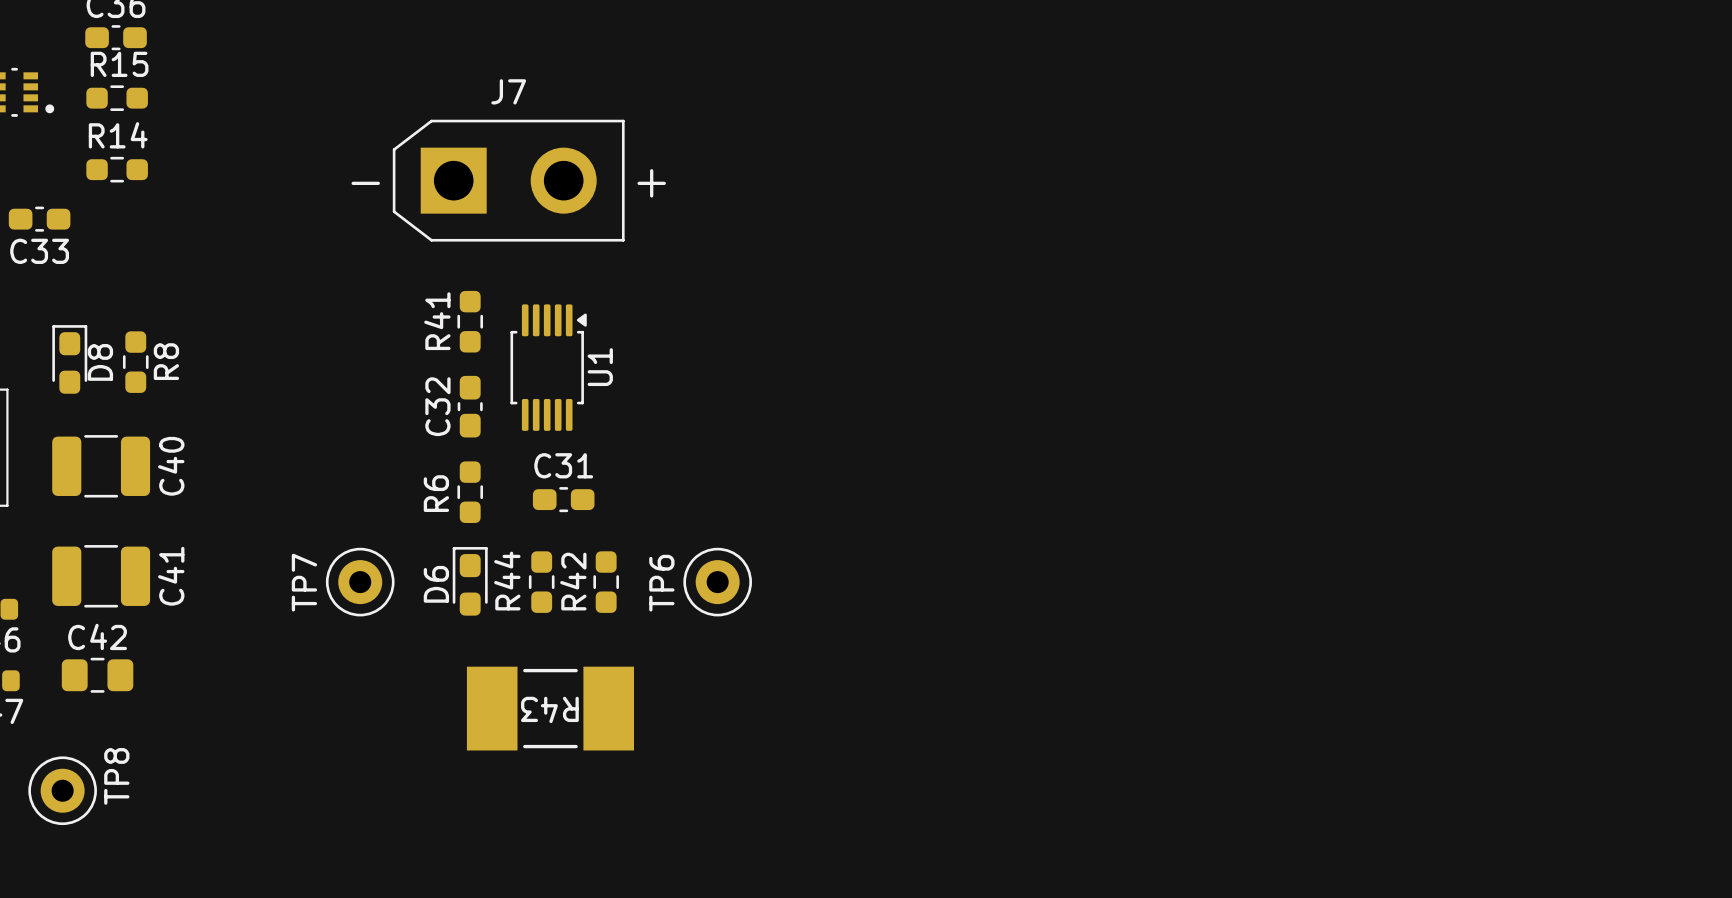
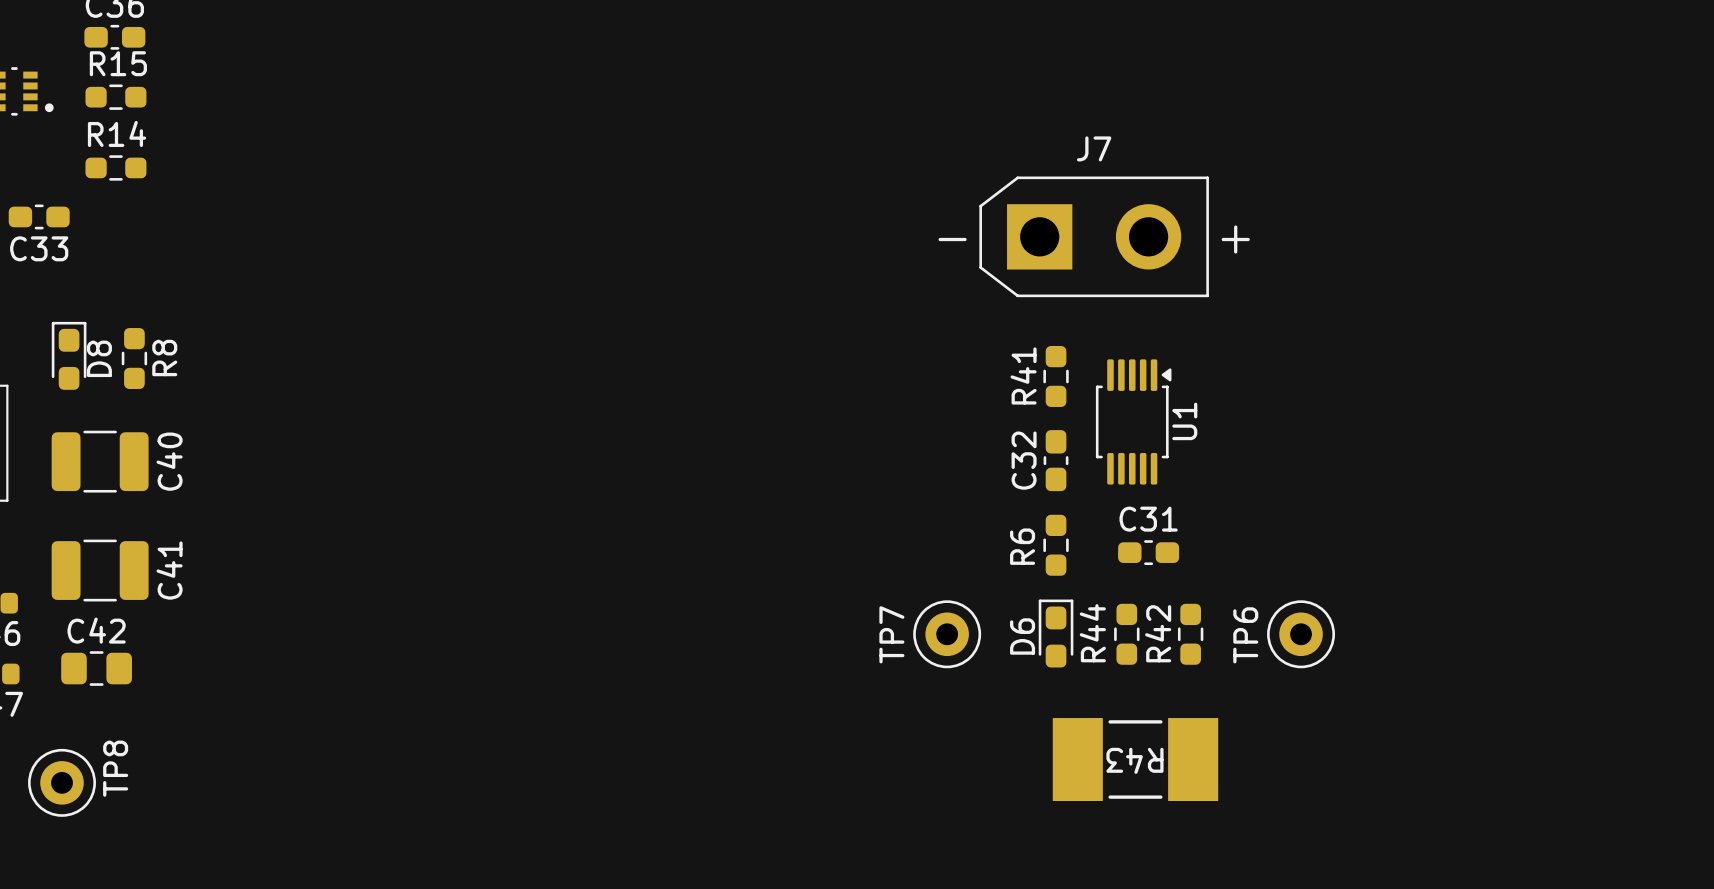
J7 position: (508, 180) -> (1094, 236)
R41 position: (470, 321) -> (1056, 376)
U1 position: (548, 367) -> (1133, 421)
C32 position: (470, 406) -> (1056, 460)
R6 position: (470, 492) -> (1056, 545)
C31 position: (563, 499) -> (1148, 552)
D6 position: (470, 581) -> (1056, 633)
TP7 position: (360, 582) -> (947, 634)
R44 position: (541, 582) -> (1126, 634)
R42 position: (606, 582) -> (1190, 634)
TP6 position: (717, 582) -> (1301, 634)
R43 position: (550, 708) -> (1135, 759)

